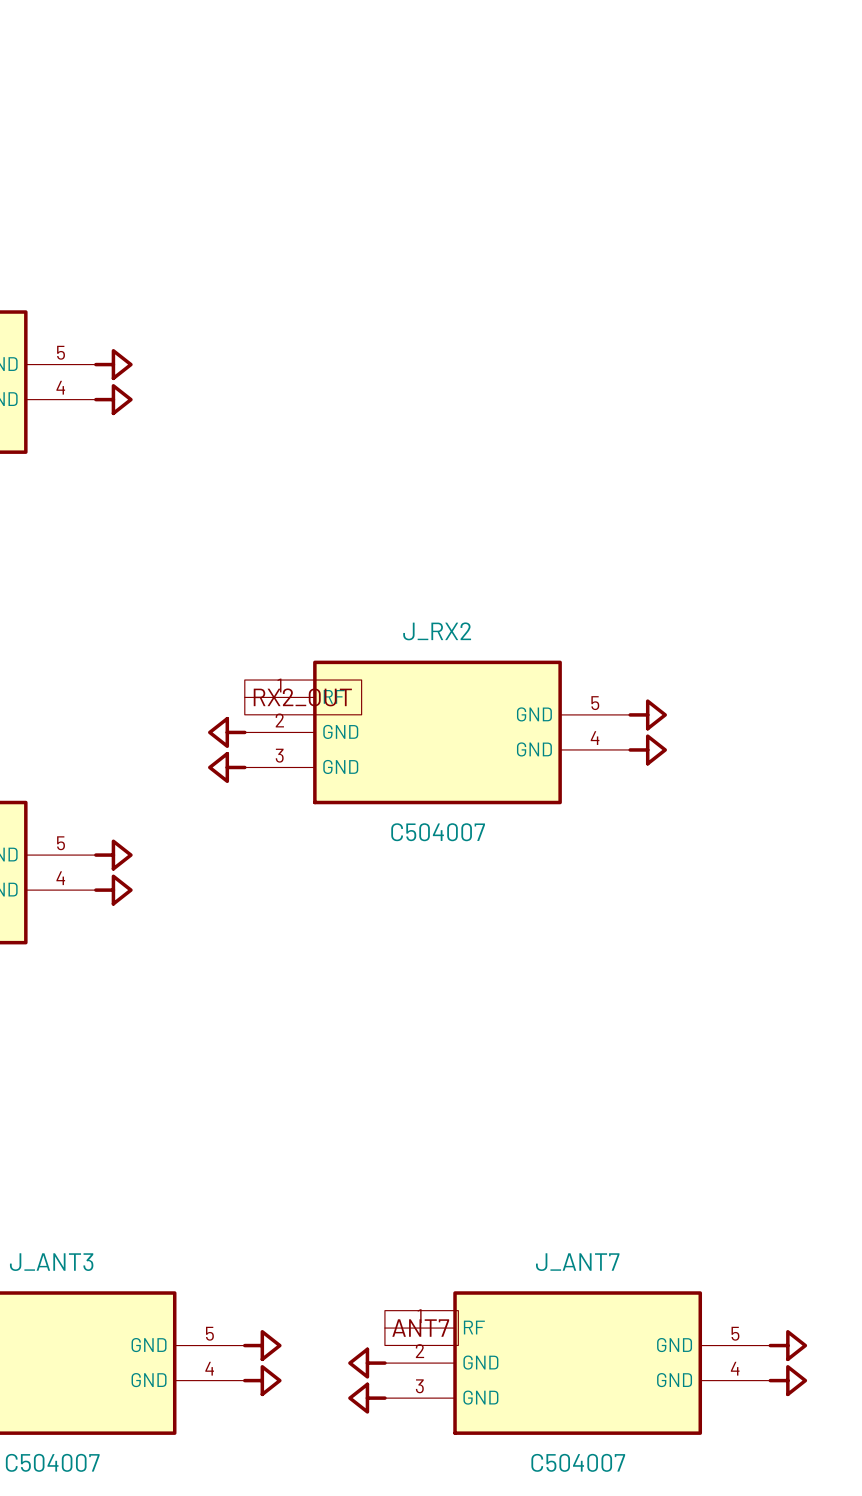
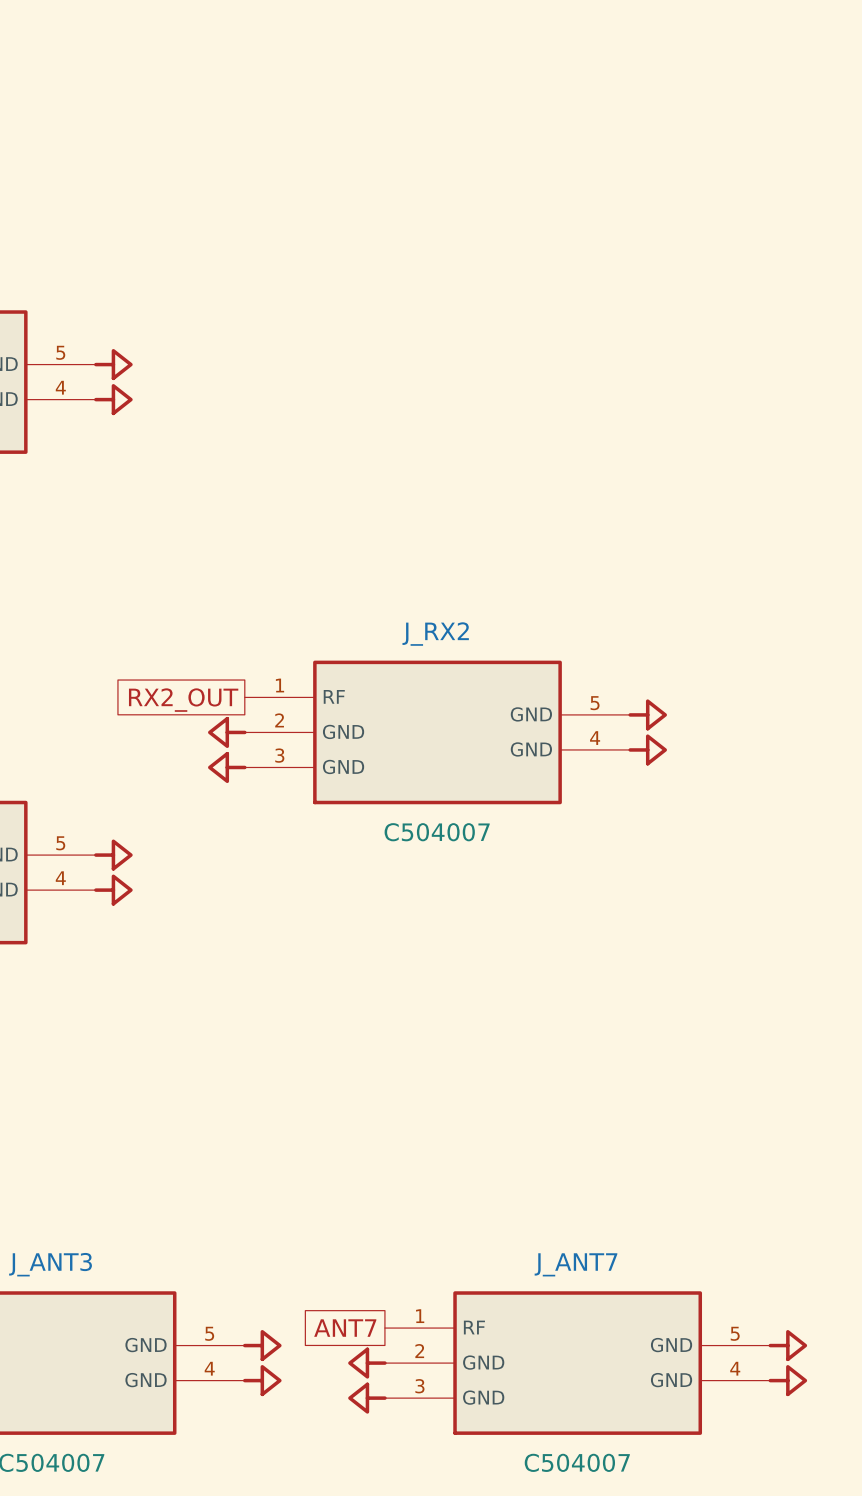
global label rotation: 0° (302, 697) -> 180° (183, 700)
global label rotation: 0° (420, 1328) -> 180° (345, 1328)

